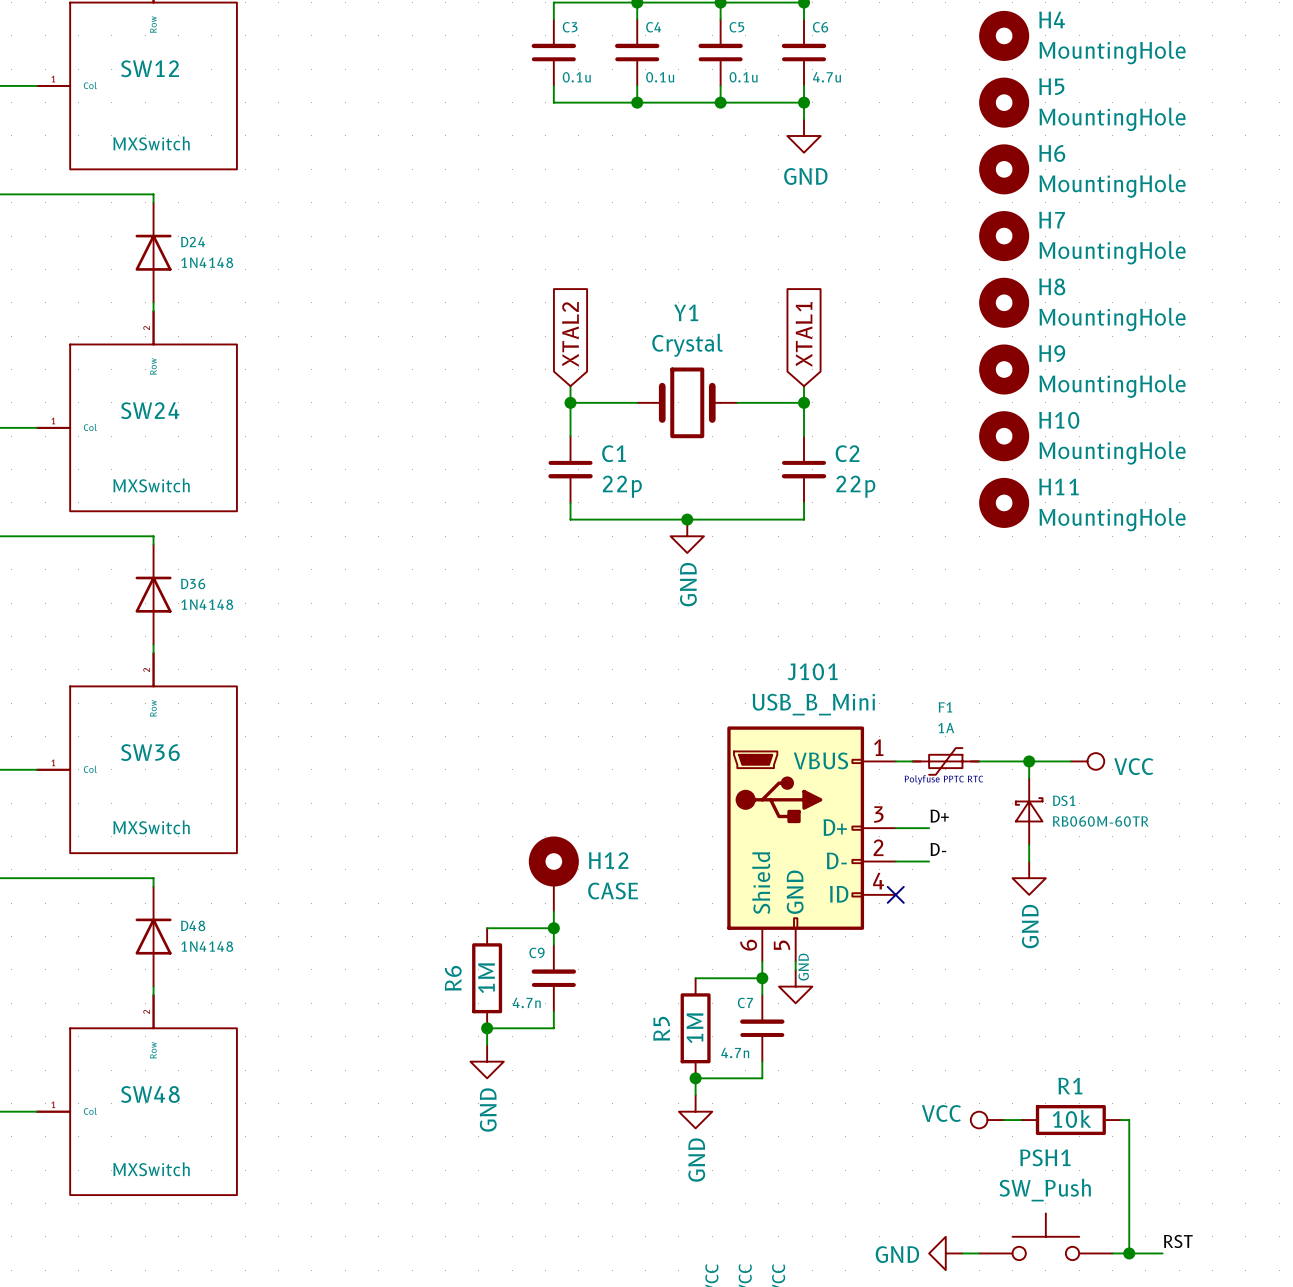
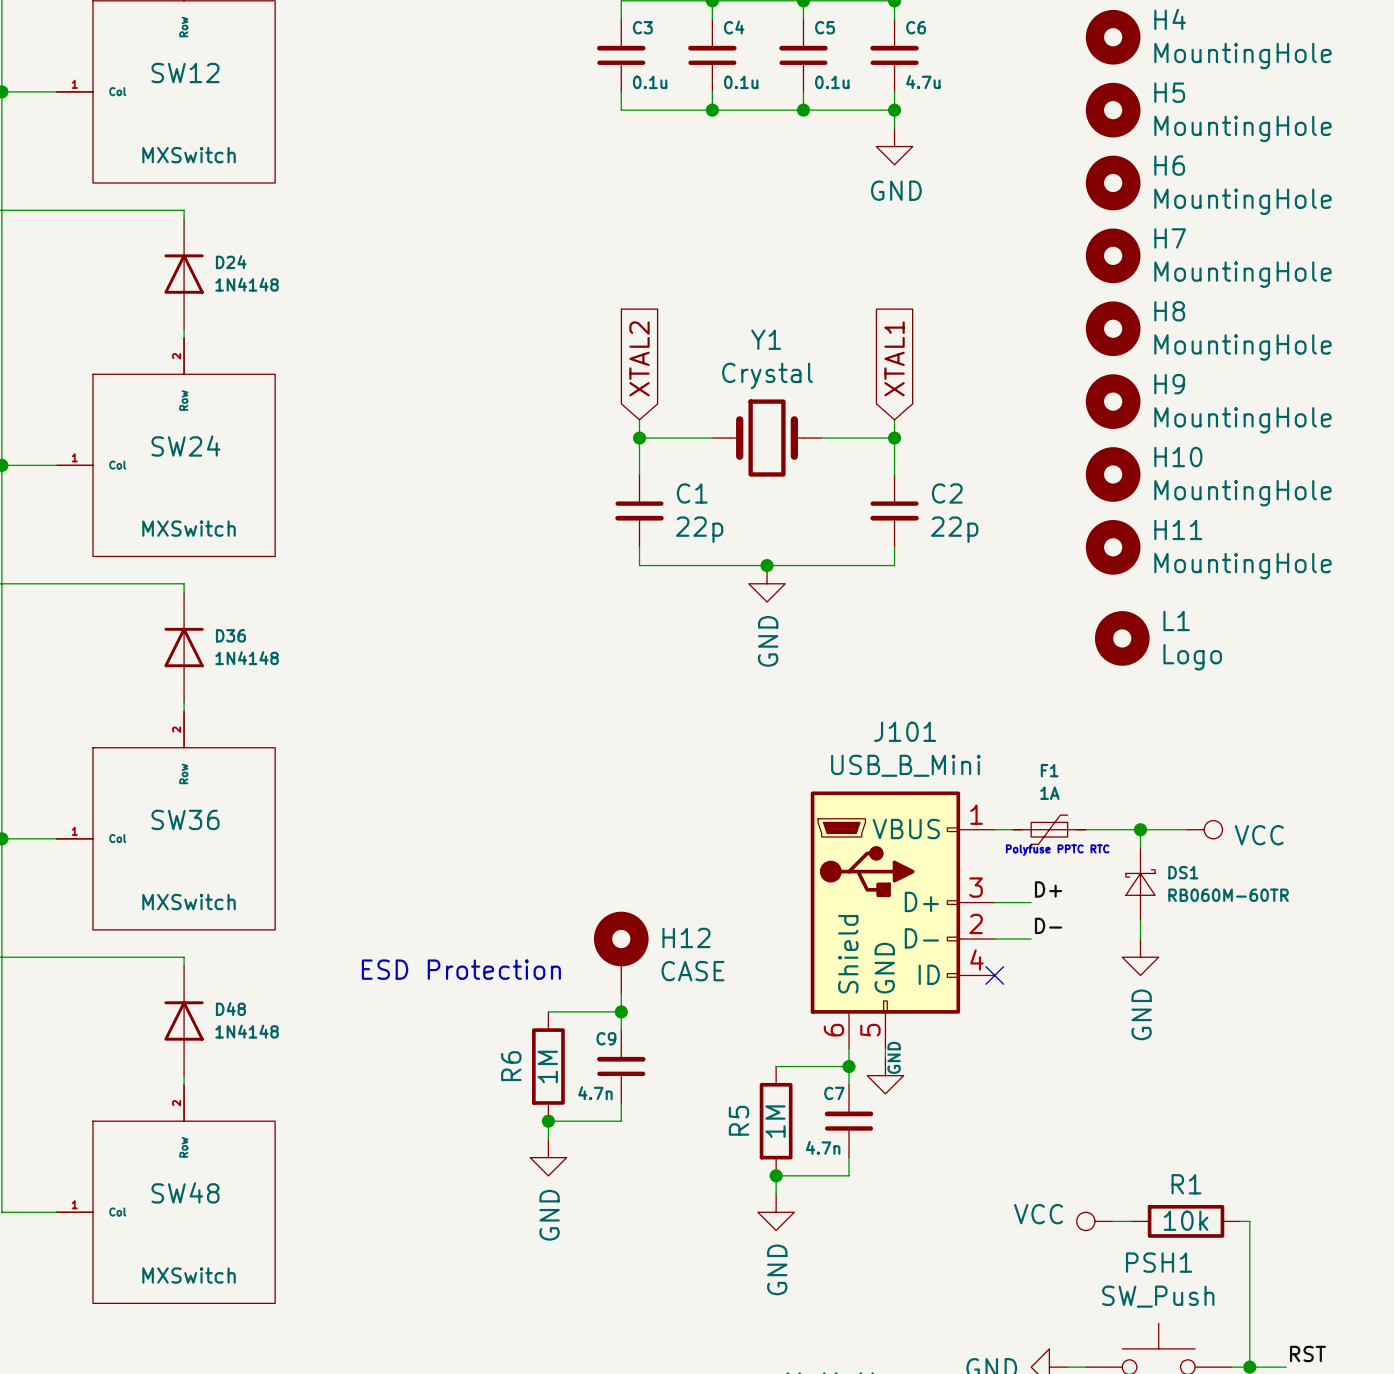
L1: none -> Logo (1122, 638)
text: none -> ESD Protection (461, 969)

